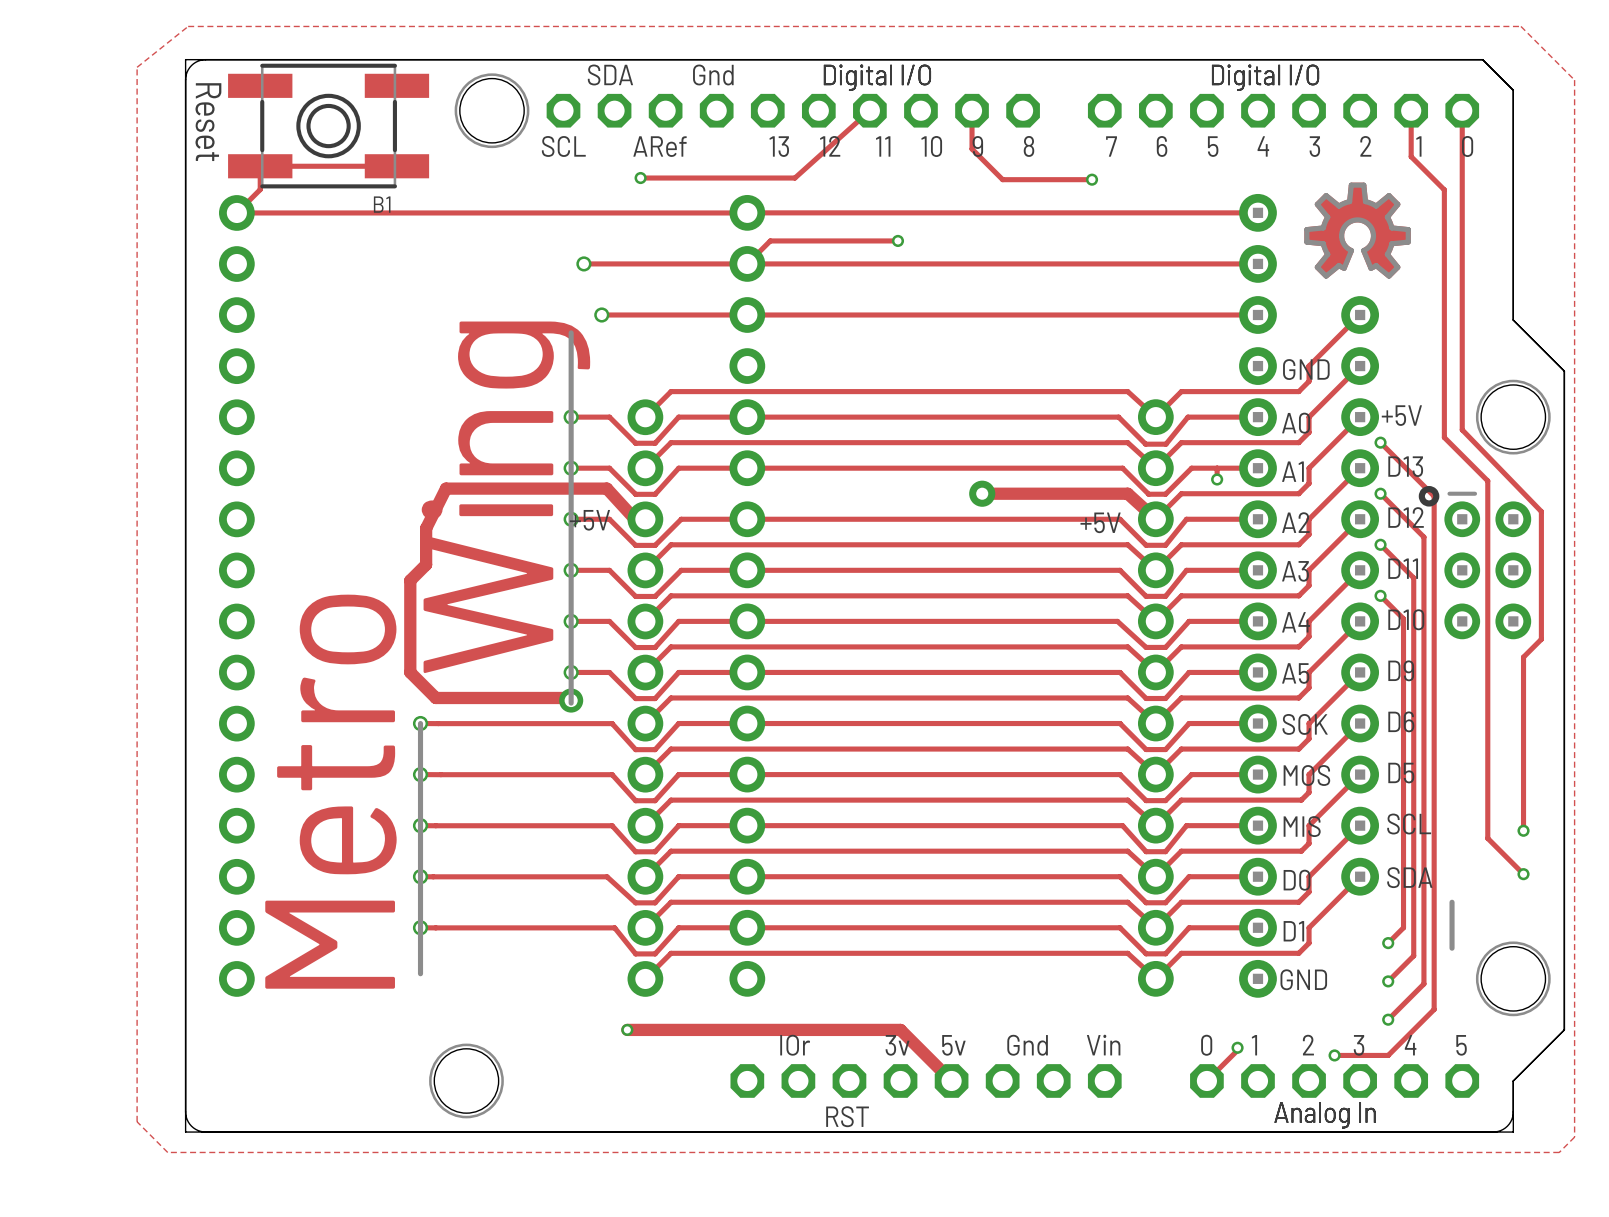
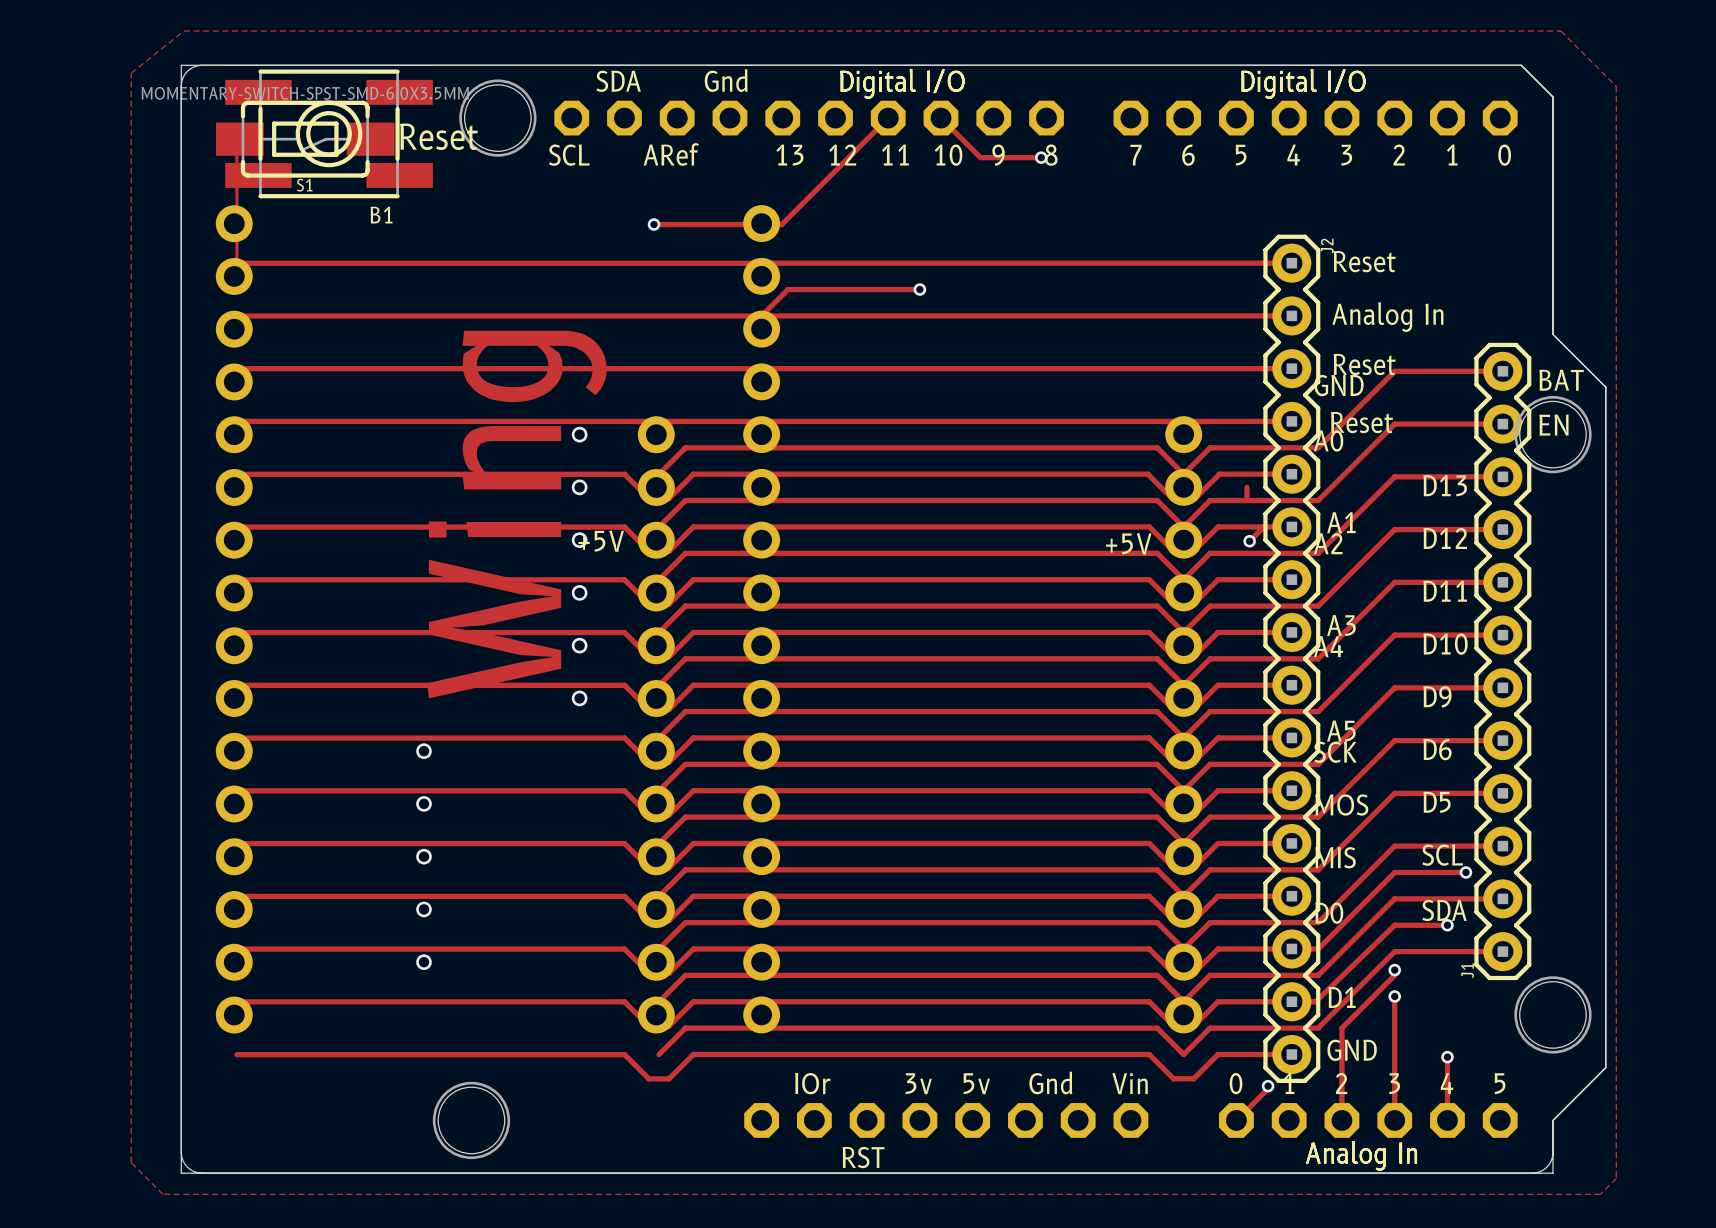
track: (869, 110) (794, 178) (640, 178) -> (888, 118) (781, 224) (654, 224)
track: none -> (941, 118) (980, 157) (1041, 157)
track: (972, 110) (972, 149) (1002, 179) (1092, 179) -> none
track: (1411, 110) (1411, 156) (1444, 189) (1444, 437) (1487, 480) (1487, 838) (1523, 874) -> none
track: (1462, 110) (1462, 429) (1541, 511) (1541, 639) (1523, 657) (1523, 830) -> none
text rotation: 0° (208, 122) -> 90° counterclockwise (438, 136)
text position: Reset (208, 122) -> Reset (438, 136)
track: none -> (239, 139) (236, 142) (236, 263) (1291, 263)
S1: none -> MOMENTARY-SWITCH-SPST-SMD-6.0X3.5MM (305, 139)
via: none -> (1041, 157)
track: (396, 166) (260, 166) (260, 189) (236, 212) (1257, 212) -> none
via position: (640, 178) -> (654, 224)
via: (1092, 179) -> none
drawing: [1304, 182, 1411, 279] -> none
track: (897, 240) (770, 240) (747, 263) (744, 264) -> none
via position: (897, 240) -> (919, 289)
text: none -> Reset (1364, 261)
track: (583, 263) (1257, 263) -> none
via: (583, 263) -> none
track: none -> (919, 289) (788, 289) (761, 316)
track: none -> (236, 316) (1291, 315)
text: none -> Analog In (1387, 317)
track: (601, 314) (1257, 314) -> none
via: (601, 314) -> none
track: (1360, 314) (1309, 366) (1309, 381) (1298, 391) (1181, 391) (1155, 417) (1127, 391) (671, 391) (645, 417) -> none
line: (571, 332) (571, 703) -> none
text: none -> Reset (1364, 364)
track: none -> (237, 368) (1291, 368)
track: none -> (1502, 371) (1394, 371) (1318, 447) (1210, 447) (1183, 474) (1157, 447) (685, 447) (658, 474)
text: none -> BAT (1561, 380)
track: (1360, 366) (1309, 417) (1309, 432) (1298, 442) (1181, 442) (1155, 468) (1127, 442) (671, 442) (645, 468) -> none
track: none -> (237, 421) (1291, 421)
text: none -> Reset (1361, 422)
track: none -> (1502, 424) (1394, 424) (1318, 500) (1210, 500) (1183, 526) (1157, 500) (685, 500) (658, 527)
text: none -> EN (1553, 425)
text: +5V (1401, 415) -> none
track: (571, 417) (609, 417) (635, 443) (655, 443) (678, 417) (1118, 417) (1145, 444) (1166, 444) (1187, 417) (1257, 417) -> none
track: (1360, 417) (1309, 468) (1309, 483) (1298, 493) (1181, 493) (1155, 519) (1127, 493) (982, 493) -> none
track: (1380, 442) (1434, 496) (1434, 1009) (1388, 1055) (1334, 1055) -> none
via: (1380, 442) -> none
track: none -> (1291, 474) (1219, 474) (1194, 499) (1173, 499) (1147, 474) (693, 474) (669, 498) (648, 498) (624, 474) (236, 474)
track: none -> (1502, 476) (1394, 476) (1318, 553) (1210, 553) (1183, 579) (1157, 553) (685, 553) (658, 579)
track: (571, 468) (609, 468) (635, 494) (655, 494) (678, 468) (1122, 468) (1148, 494) (1165, 494) (1191, 468) (1257, 468) -> none
track: (1360, 468) (1309, 519) (1309, 534) (1298, 544) (1181, 544) (1155, 570) (1127, 544) (671, 544) (645, 570) -> none
text position: A1 (1292, 471) -> A1 (1341, 522)
via position: (1217, 479) -> (1249, 541)
drawing: [1418, 485, 1440, 507] -> none
via: (982, 493) -> none
track: (1380, 493) (1423, 537) (1423, 983) (1388, 1019) -> none
via: (1380, 493) -> none
track: none -> (236, 527) (624, 527) (648, 551) (669, 551) (693, 526) (1149, 526) (1173, 551) (1193, 551) (1218, 526) (1291, 526)
track: none -> (1263, 526) (1249, 541)
track: none -> (1502, 529) (1394, 529) (1318, 606) (1210, 606) (1183, 632) (1157, 606) (685, 606) (658, 632)
track: (571, 519) (609, 519) (635, 545) (655, 545) (681, 519) (1120, 519) (1146, 545) (1165, 545) (1186, 519) (1257, 519) -> none
track: (645, 519) (635, 519) (606, 488) (446, 488) (426, 528) (426, 564) (410, 580) (410, 672) (435, 697) (568, 697) (571, 700) -> none
track: (1360, 519) (1309, 570) (1309, 585) (1298, 595) (1181, 595) (1155, 621) (1127, 595) (671, 595) (645, 621) -> none
track: (1380, 544) (1413, 577) (1413, 955) (1388, 981) -> none
via: (1380, 544) -> none
track: none -> (236, 579) (624, 579) (648, 604) (669, 604) (693, 579) (1149, 579) (1173, 603) (1193, 603) (1218, 579) (1291, 579)
track: none -> (1502, 582) (1394, 582) (1318, 658) (1210, 658) (1183, 685) (1157, 658) (685, 658) (658, 685)
part: (1487, 565) -> none
track: (571, 570) (609, 570) (635, 596) (655, 596) (681, 570) (1120, 570) (1146, 596) (1165, 596) (1186, 570) (1257, 570) -> none
track: (1360, 570) (1309, 621) (1309, 636) (1298, 646) (1181, 646) (1155, 672) (1127, 646) (671, 646) (645, 672) -> none
text position: A3 (1295, 571) -> A3 (1341, 625)
part: (1257, 595) -> none
part: (1360, 595) -> none
track: (1380, 595) (1403, 618) (1403, 927) (1388, 943) -> none
via: (1380, 595) -> none
track: none -> (1291, 632) (1218, 632) (1193, 656) (1173, 656) (1149, 632) (693, 632) (669, 656) (648, 656) (624, 632) (236, 632)
track: none -> (1502, 635) (1394, 635) (1318, 711) (1210, 711) (1183, 737) (1157, 711) (685, 711) (658, 738)
track: (571, 621) (609, 621) (635, 647) (655, 647) (678, 621) (1117, 621) (1146, 647) (1165, 647) (1189, 621) (1257, 621) -> none
track: (1360, 621) (1309, 672) (1309, 687) (1298, 697) (1181, 697) (1155, 723) (1127, 697) (671, 697) (645, 723) -> none
J2: none -> (1291, 658)
J1: none -> (1502, 661)
track: none -> (1291, 685) (1218, 685) (1193, 709) (1173, 709) (1149, 685) (693, 685) (669, 709) (648, 709) (624, 685) (236, 685)
track: none -> (1502, 687) (1394, 687) (1318, 764) (1210, 764) (1183, 790) (1157, 764) (685, 764) (658, 790)
track: (571, 672) (609, 672) (635, 698) (655, 698) (678, 672) (1120, 672) (1146, 698) (1165, 698) (1189, 672) (1257, 672) -> none
track: (1360, 672) (1309, 723) (1309, 738) (1298, 749) (1181, 749) (1155, 774) (1127, 749) (671, 749) (645, 774) -> none
text position: A5 (1295, 673) -> A5 (1341, 731)
via: (571, 700) -> none
track: none -> (236, 738) (624, 738) (648, 762) (669, 762) (693, 737) (1149, 737) (1173, 762) (1193, 762) (1218, 737) (1291, 737)
track: none -> (1502, 740) (1394, 740) (1318, 817) (1210, 817) (1183, 843) (1157, 817) (685, 817) (658, 843)
line: (420, 723) (420, 973) -> none
track: (420, 723) (612, 723) (635, 749) (655, 749) (678, 723) (1120, 723) (1146, 749) (1165, 749) (1189, 723) (1257, 723) -> none
track: (1360, 723) (1309, 774) (1309, 792) (1301, 800) (1181, 800) (1155, 825) (1127, 800) (671, 800) (645, 825) -> none
track: none -> (236, 790) (624, 790) (648, 815) (669, 815) (693, 790) (1149, 790) (1173, 814) (1193, 814) (1218, 790) (1291, 790)
track: none -> (1502, 793) (1394, 793) (1318, 869) (1210, 869) (1183, 896) (1157, 869) (685, 869) (658, 896)
track: (420, 774) (612, 774) (635, 800) (655, 800) (678, 774) (1120, 774) (1146, 800) (1165, 800) (1191, 774) (1257, 774) -> none
track: (1360, 774) (1309, 825) (1309, 843) (1301, 851) (1181, 851) (1155, 876) (1127, 851) (671, 851) (645, 876) -> none
text: Metro (330, 791) -> none
track: none -> (1291, 843) (1218, 843) (1193, 867) (1173, 867) (1149, 843) (693, 843) (669, 867) (648, 867) (624, 843) (236, 843)
track: none -> (1502, 846) (1394, 846) (1318, 922) (1210, 922) (1183, 948) (1157, 922) (685, 922) (658, 949)
track: (420, 825) (612, 825) (635, 851) (655, 851) (678, 825) (1122, 825) (1146, 851) (1165, 851) (1186, 825) (1257, 825) -> none
track: (1360, 825) (1309, 876) (1309, 892) -> (1465, 872) (1394, 872) (1341, 925)
via: (1523, 830) -> none
via: none -> (1465, 872)
track: none -> (1291, 896) (1218, 896) (1193, 920) (1173, 920) (1149, 896) (693, 896) (669, 920) (648, 920) (624, 896) (236, 896)
track: none -> (1502, 898) (1394, 898) (1318, 975) (1210, 975) (1183, 1001) (1157, 975) (685, 975) (658, 1001)
via: (1523, 874) -> none
track: (420, 876) (607, 876) (635, 902) (655, 902) (678, 876) (1120, 876) (1146, 902) (1165, 902) (1189, 876) (1257, 876) -> none
track: (1360, 876) (1309, 927) (1309, 943) (1298, 953) (1181, 953) (1155, 978) (1127, 953) (671, 953) (645, 978) -> none
track: none -> (1447, 925) (1394, 925) (1315, 1001) (1218, 1001) (1193, 1026) (1173, 1026) (1149, 1001) (693, 1001) (669, 1026) (648, 1026) (624, 1001) (236, 1001)
via: none -> (1447, 925)
track: (1298, 902) (1181, 902) (1155, 927) (1127, 902) (671, 902) (645, 927) -> (1331, 935) (1318, 948) (1218, 948) (1193, 973) (1173, 973) (1149, 948) (693, 948) (669, 973) (648, 973) (624, 949) (236, 949)
line: (1452, 902) (1452, 948) -> none
track: none -> (1502, 951) (1394, 951) (1318, 1028) (1210, 1028) (1183, 1054) (1157, 1028) (685, 1028) (658, 1054)
track: (420, 927) (614, 927) (635, 953) (655, 953) (678, 927) (1120, 927) (1146, 953) (1165, 953) (1189, 927) (1257, 927) -> none
text position: D1 (1293, 931) -> D1 (1342, 997)
track: none -> (1394, 970) (1394, 975) (1341, 1028) (1341, 1120)
via: none -> (1394, 970)
via: (1388, 943) -> none
track: none -> (1394, 996) (1394, 1120)
via: none -> (1394, 996)
text position: GND (1303, 979) -> GND (1352, 1050)
via: (1388, 981) -> none
track: none -> (236, 1054) (624, 1054) (648, 1078) (669, 1078) (693, 1054) (1149, 1054) (1173, 1078) (1193, 1078) (1218, 1054) (1291, 1054)
via: (1388, 1019) -> none
track: none -> (1447, 1057) (1447, 1120)
via: none -> (1447, 1057)
track: (627, 1029) (900, 1029) (951, 1080) -> none
via: (627, 1029) -> none
via: (1334, 1055) -> none

